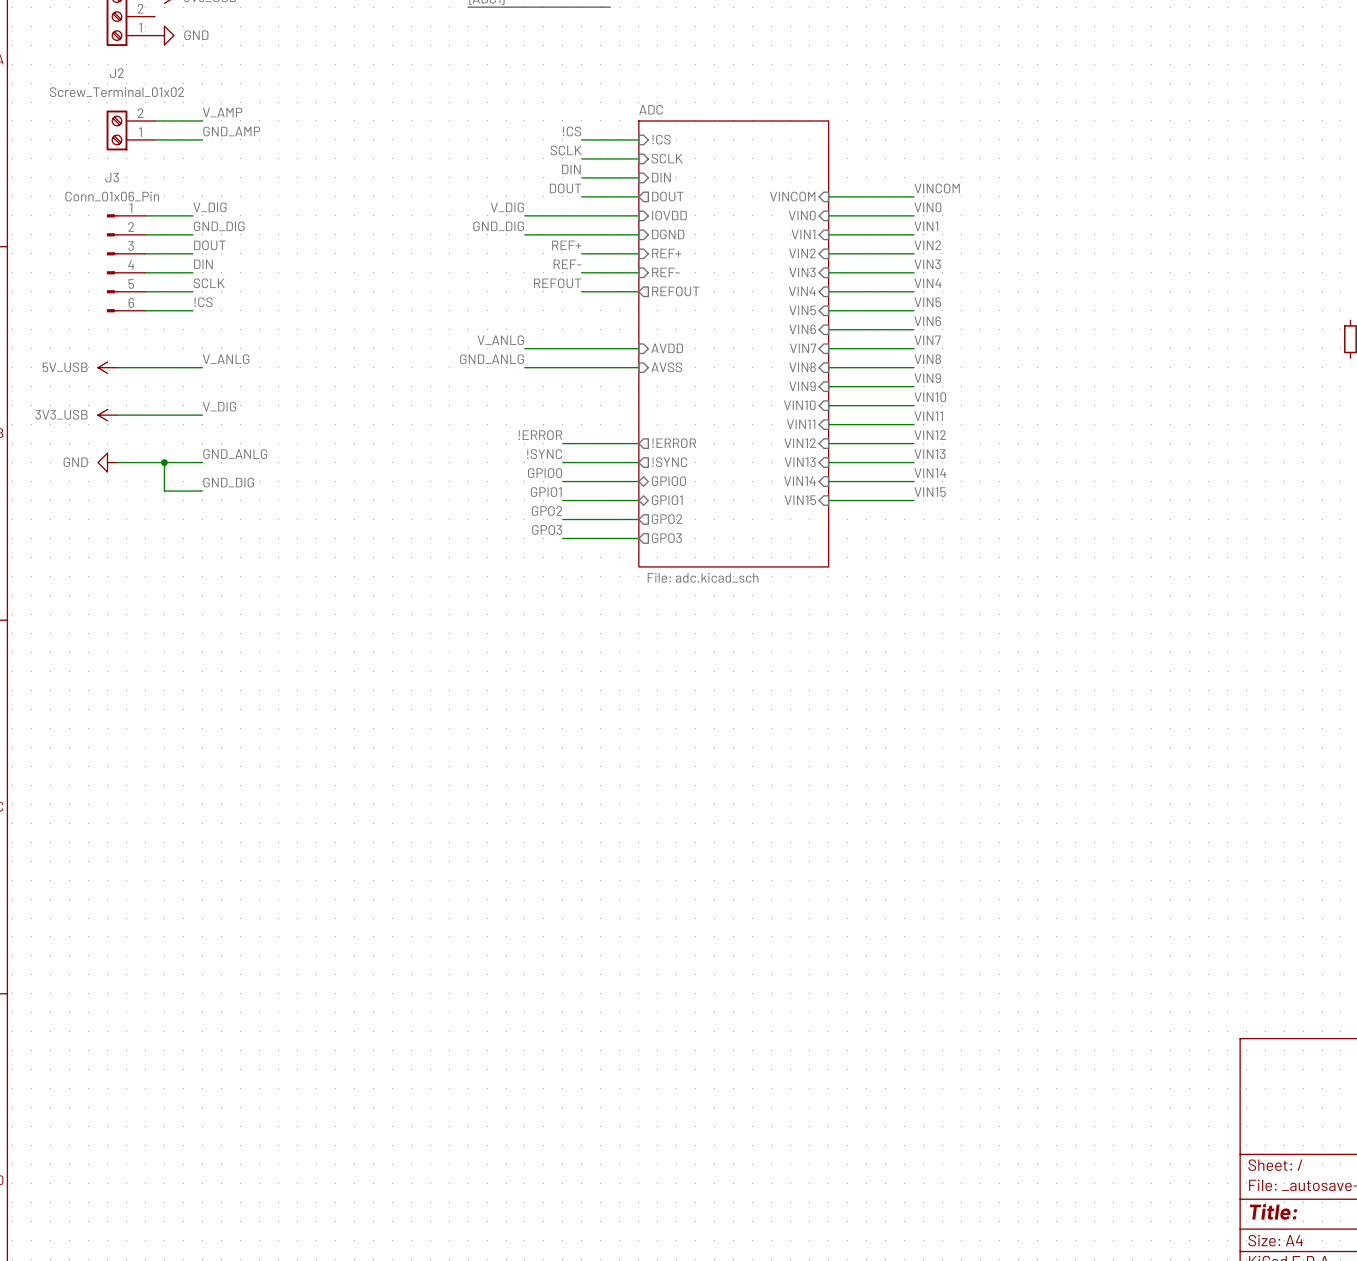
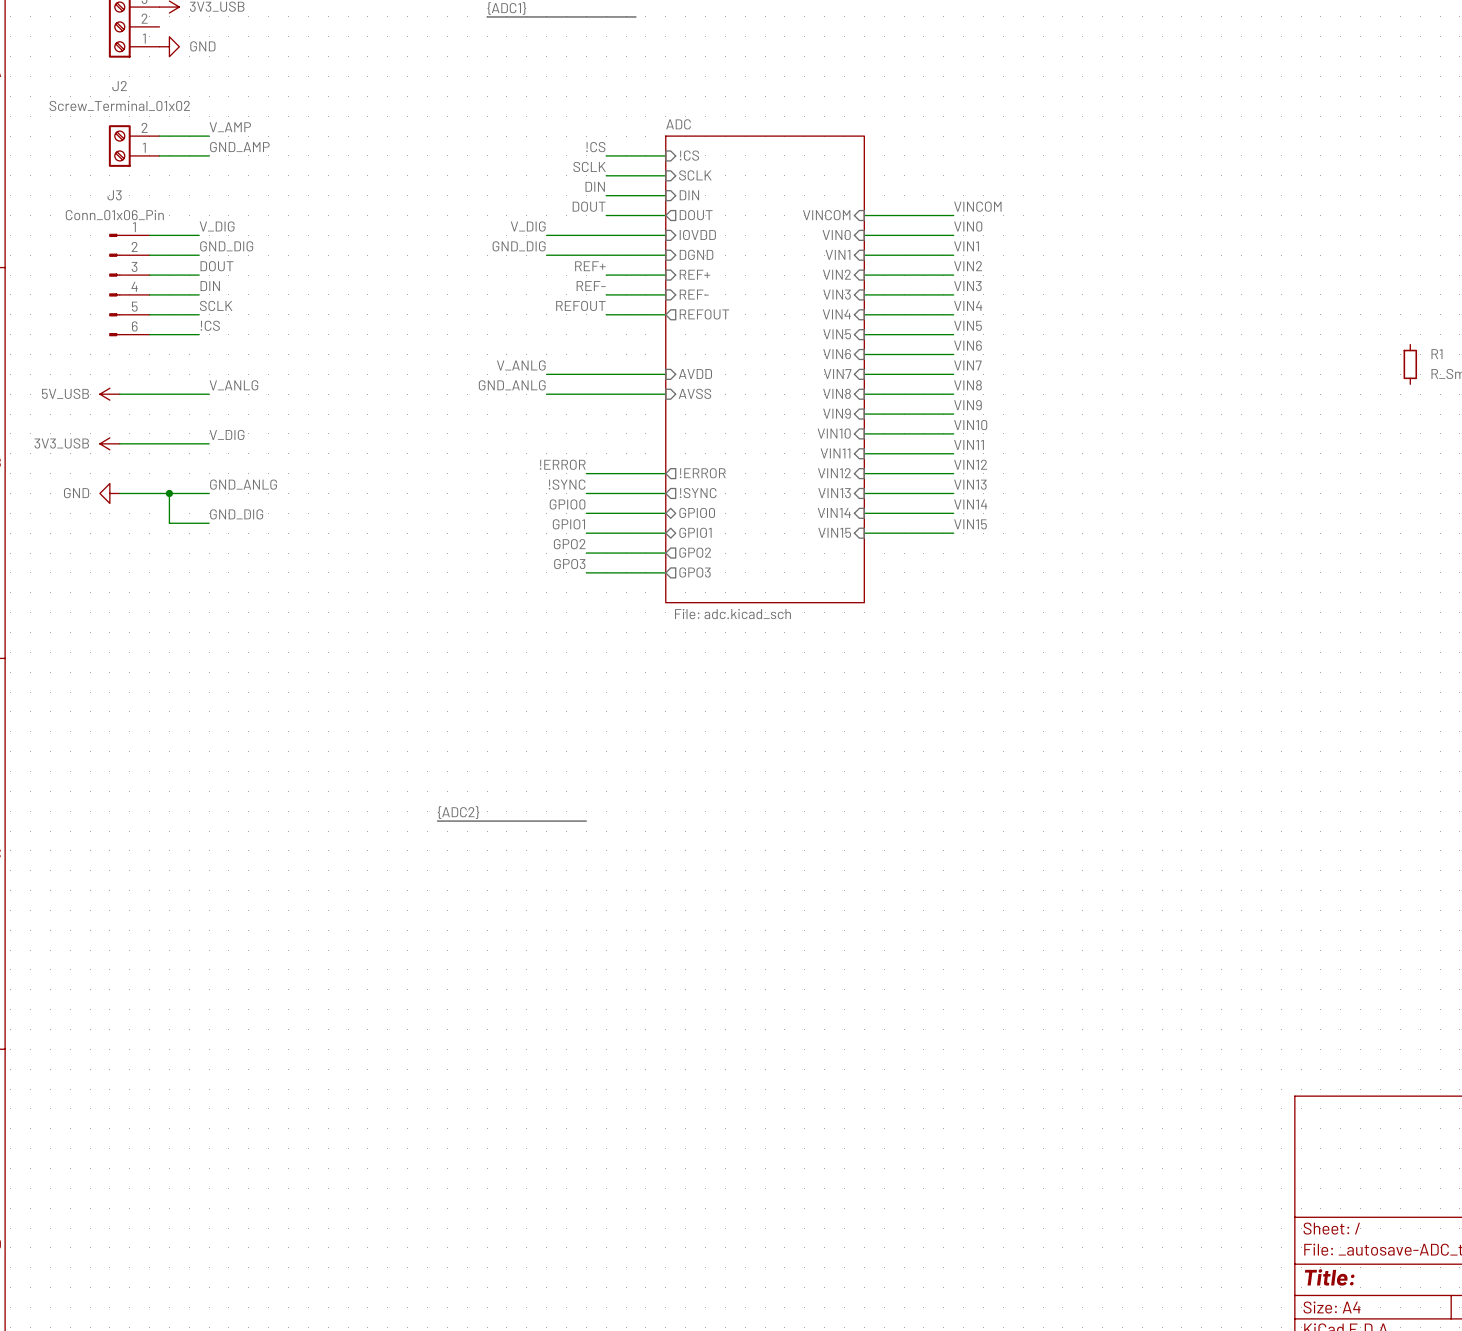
label: none -> {ADC2} (458, 812)
bus: none -> (437, 821) (586, 821)

